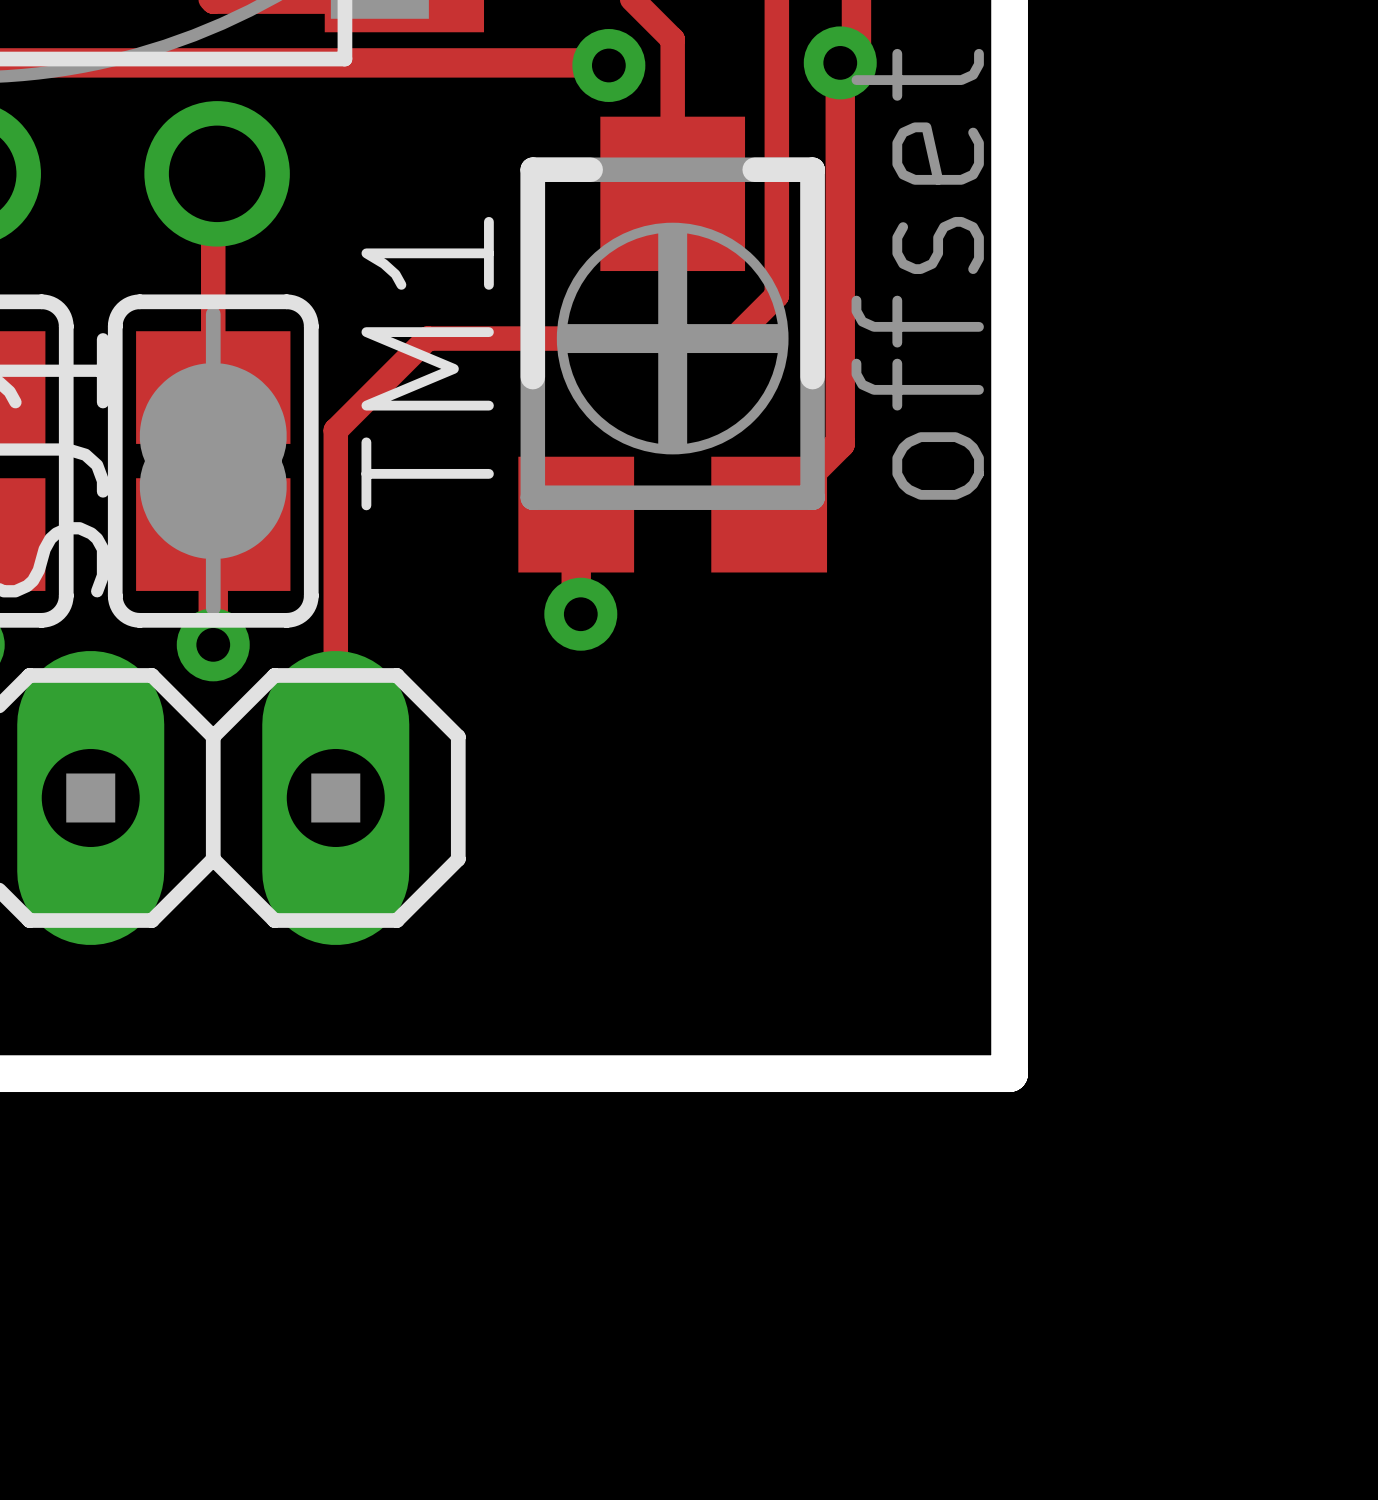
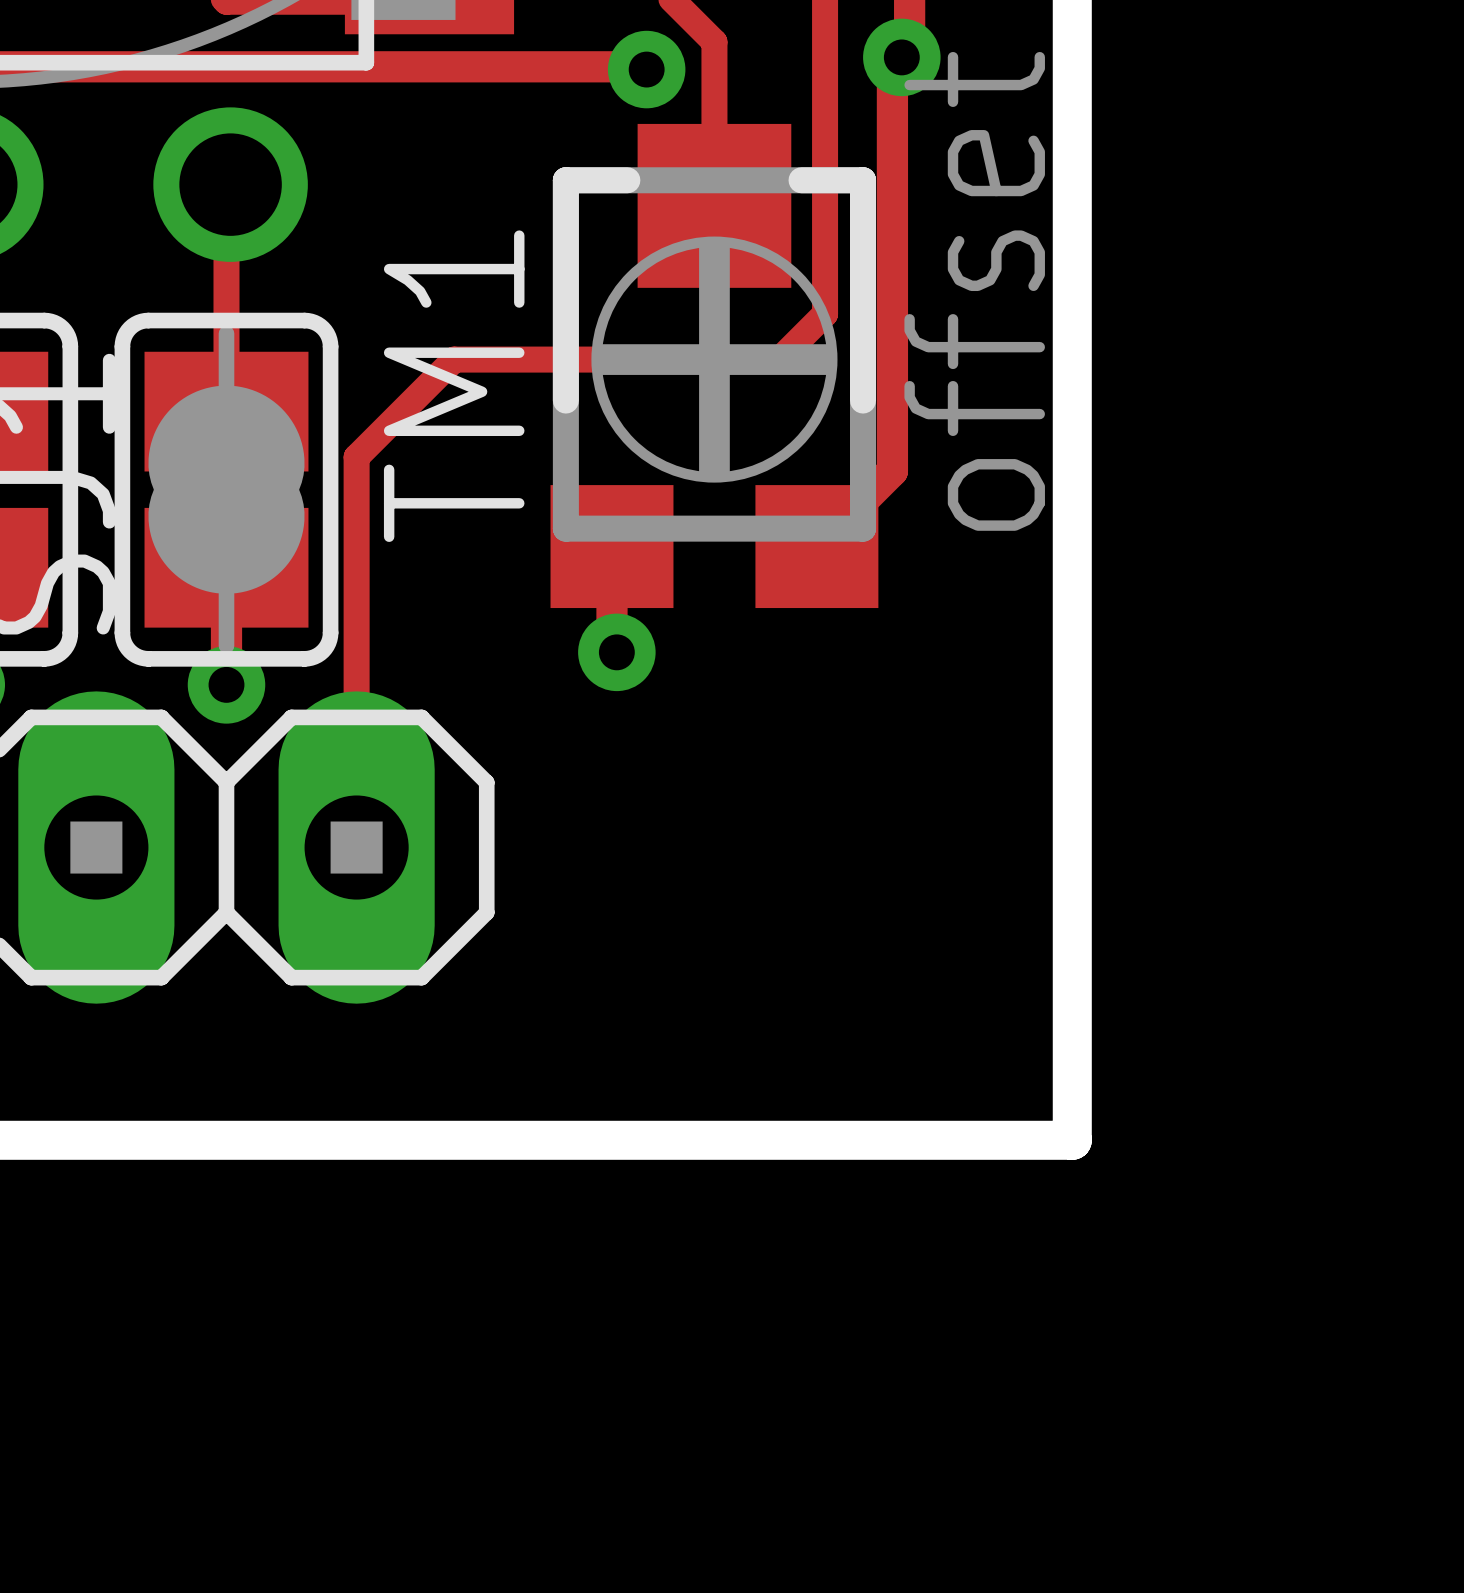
via position: (840, 62) -> (901, 57)

